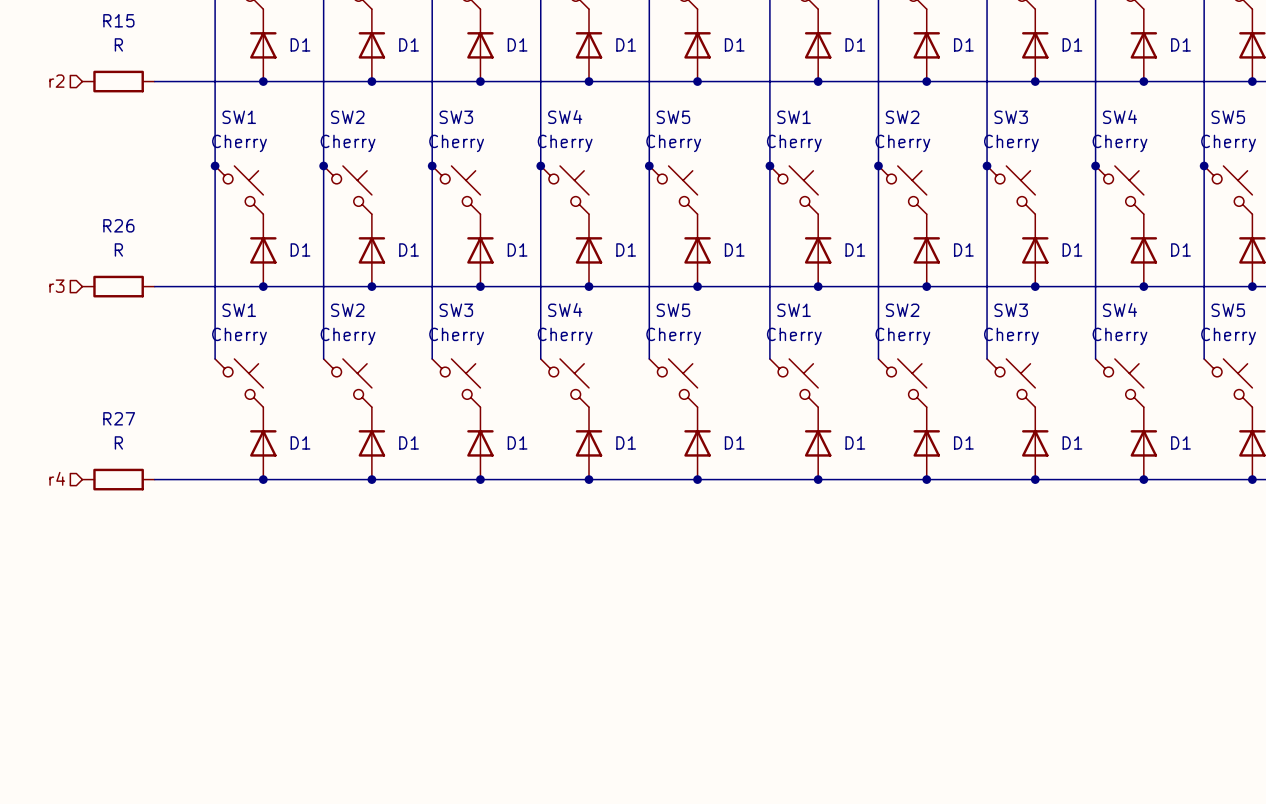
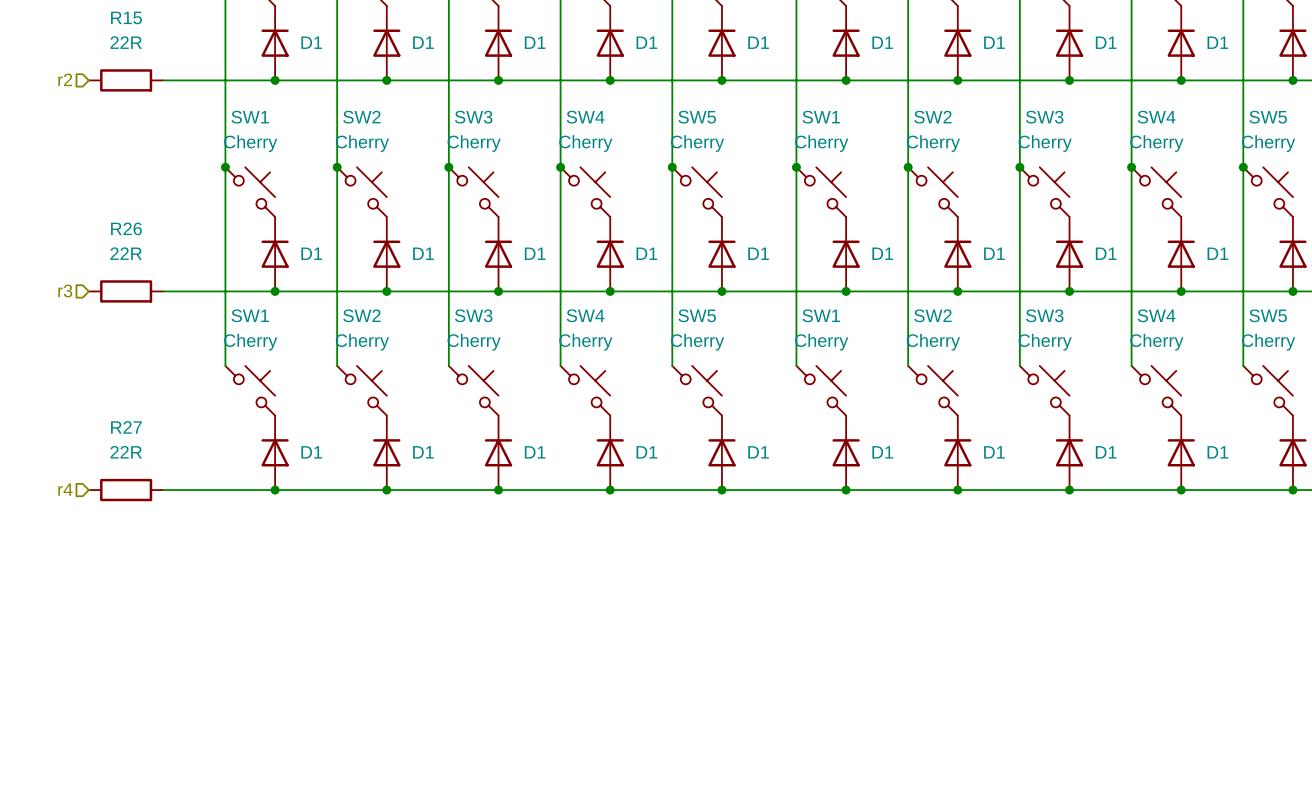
R15 value: R (118, 44) -> 22R (126, 42)
R26 value: R (118, 249) -> 22R (126, 253)
R27 value: R (118, 442) -> 22R (126, 452)

